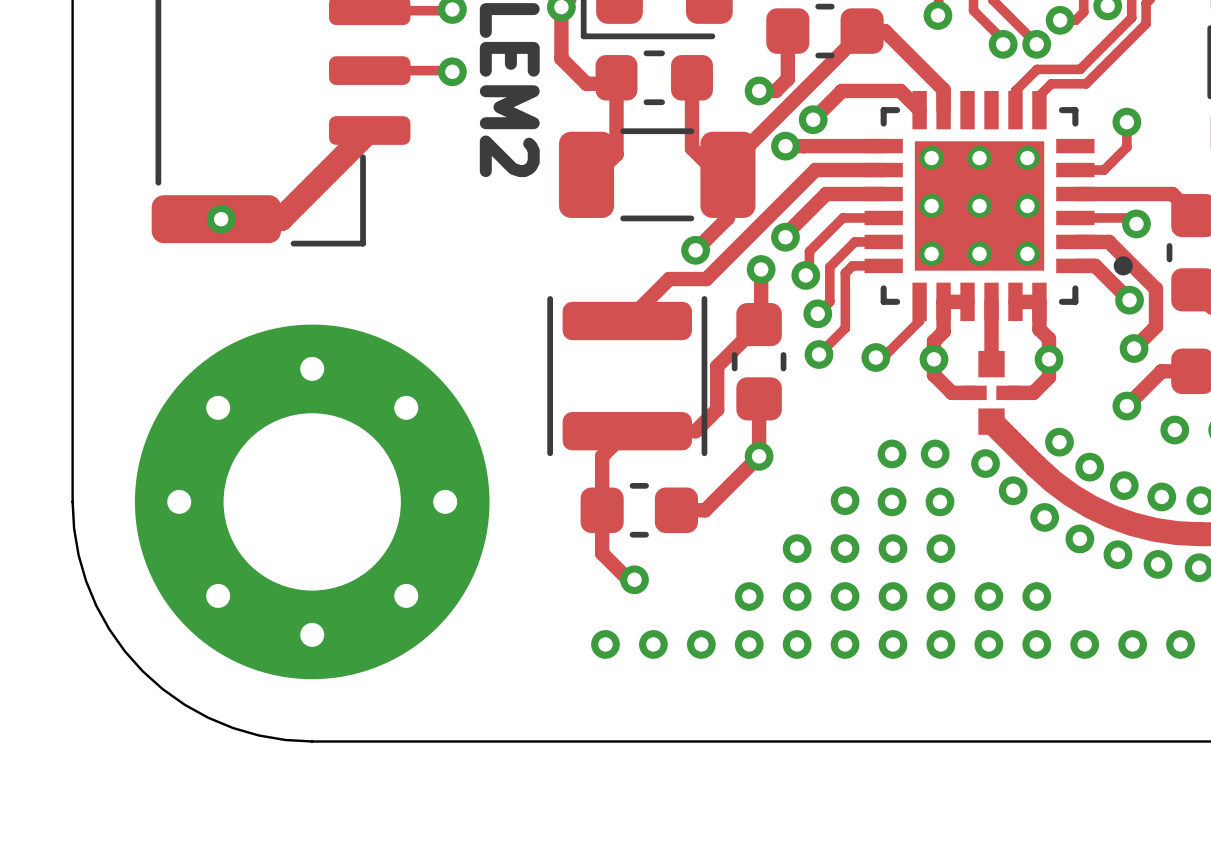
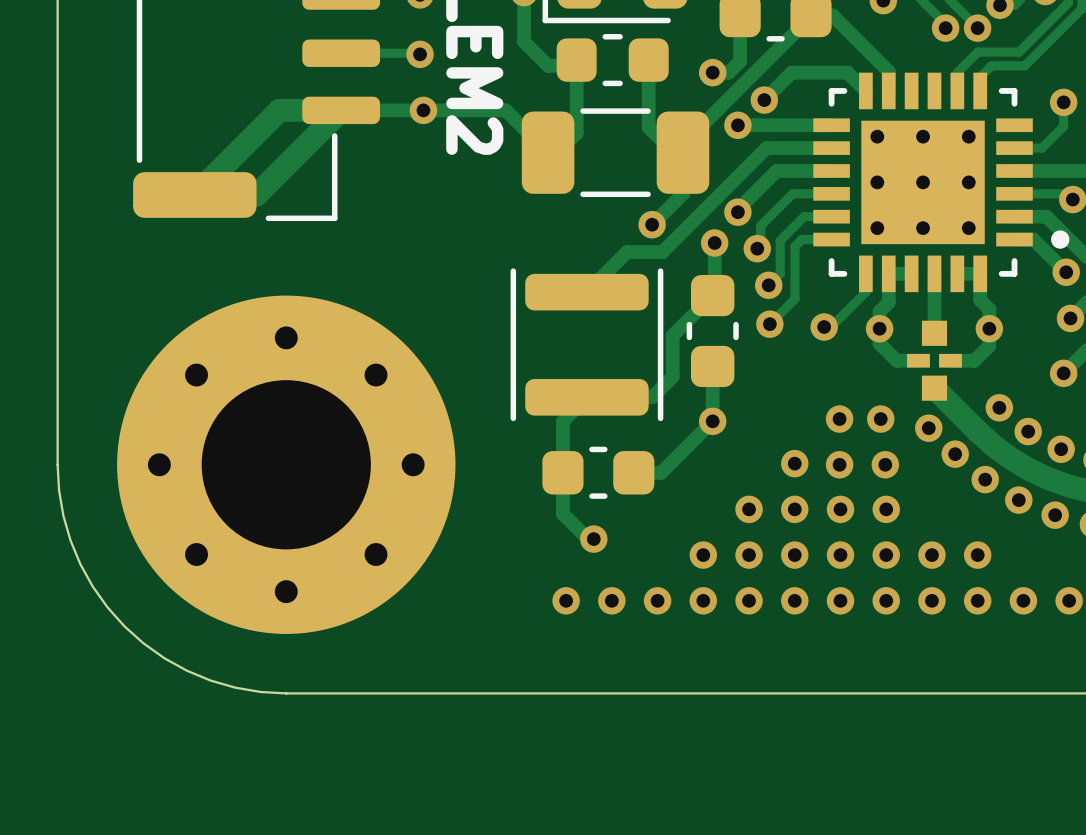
track: none -> (548, 152) (505, 110) (279, 110) (194, 194)
via position: (221, 219) -> (423, 110)

